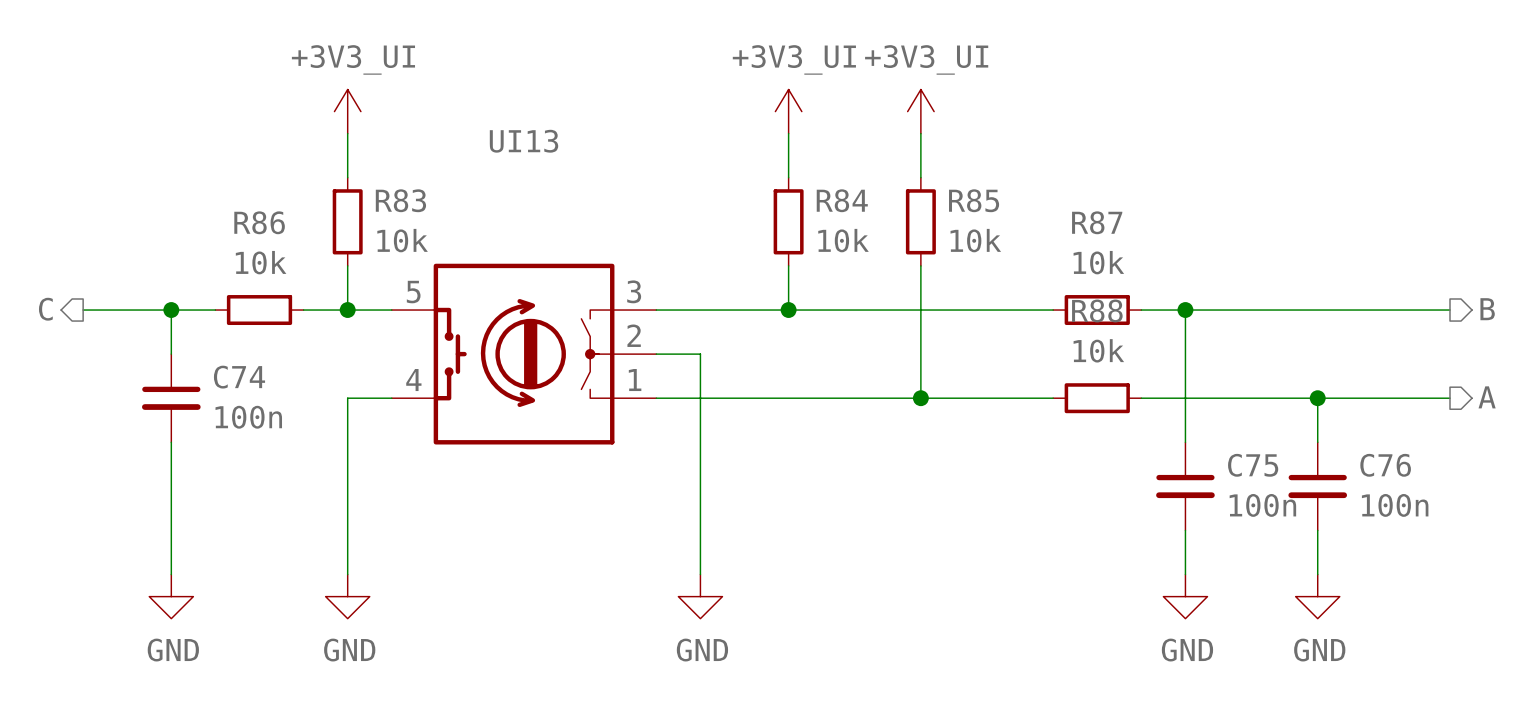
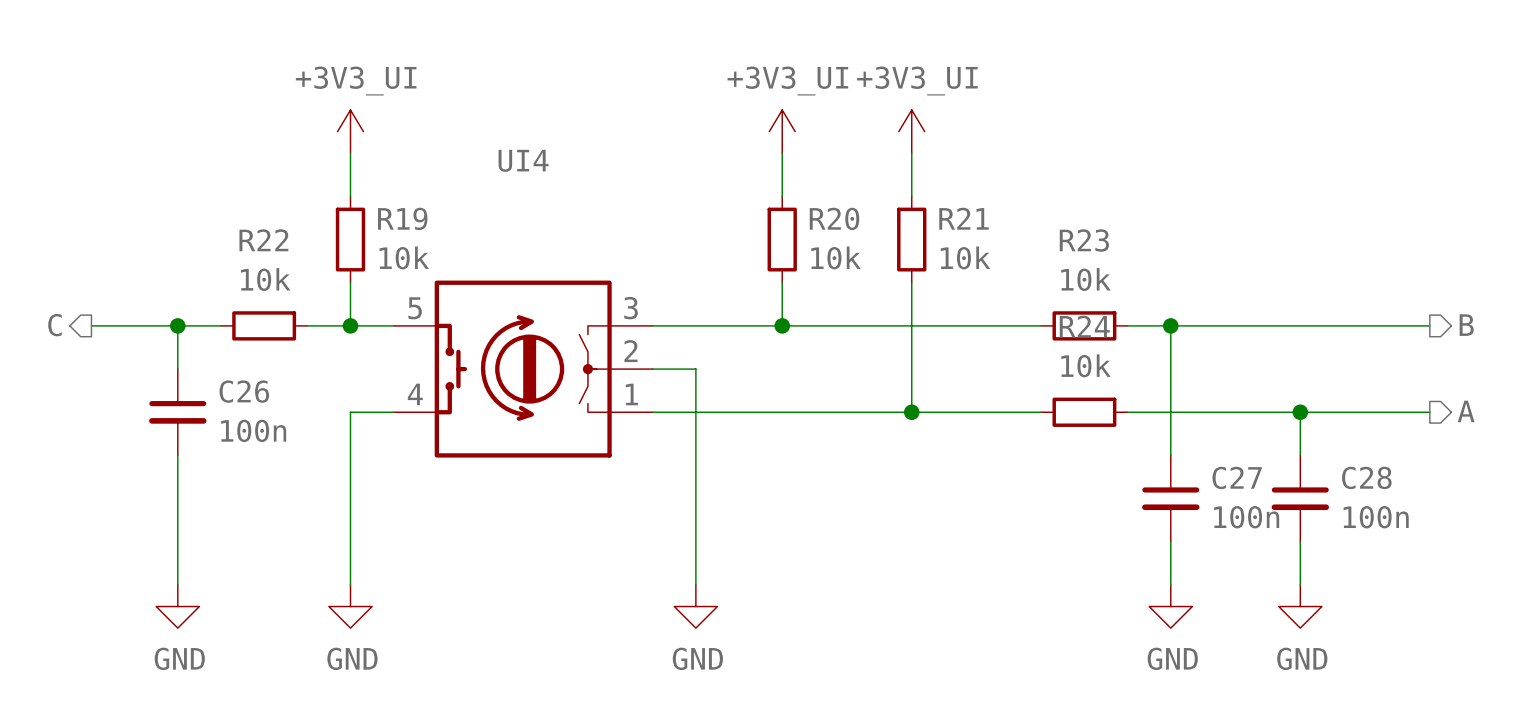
UI13 name: UI13 (524, 141) -> UI4 (523, 160)
R83 name: R83 (400, 200) -> R19 (402, 218)
R84 name: R84 (842, 200) -> R20 (834, 218)
R85 name: R85 (974, 200) -> R21 (963, 218)
R86 name: R86 (259, 222) -> R22 (263, 240)
R87 name: R87 (1097, 222) -> R23 (1084, 240)
R88 name: R88 (1097, 310) -> R24 (1084, 326)
C74 name: C74 (239, 377) -> C26 (244, 391)
C75 name: C75 (1253, 465) -> C27 (1237, 477)
C76 name: C76 (1385, 465) -> C28 (1366, 477)

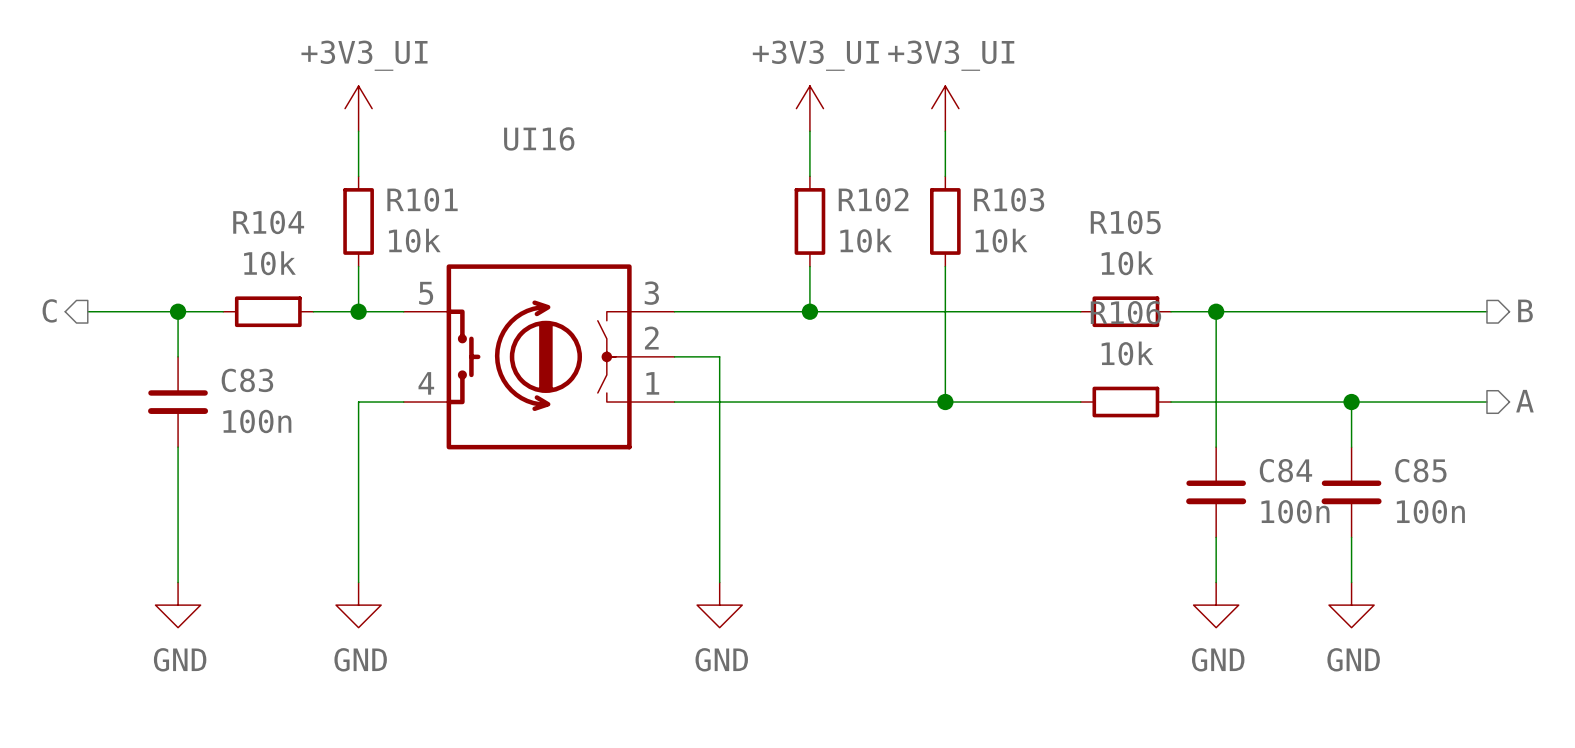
UI4 name: UI4 (523, 160) -> UI16 (539, 138)
R19 name: R19 (402, 218) -> R101 (422, 199)
R20 name: R20 (834, 218) -> R102 (873, 199)
R21 name: R21 (963, 218) -> R103 (1009, 199)
R22 name: R22 (263, 240) -> R104 (268, 222)
R23 name: R23 (1084, 240) -> R105 (1125, 222)
R24 name: R24 (1084, 326) -> R106 (1125, 312)
C26 name: C26 (244, 391) -> C83 (247, 380)
C27 name: C27 (1237, 477) -> C84 (1285, 470)
C28 name: C28 (1366, 477) -> C85 (1420, 470)

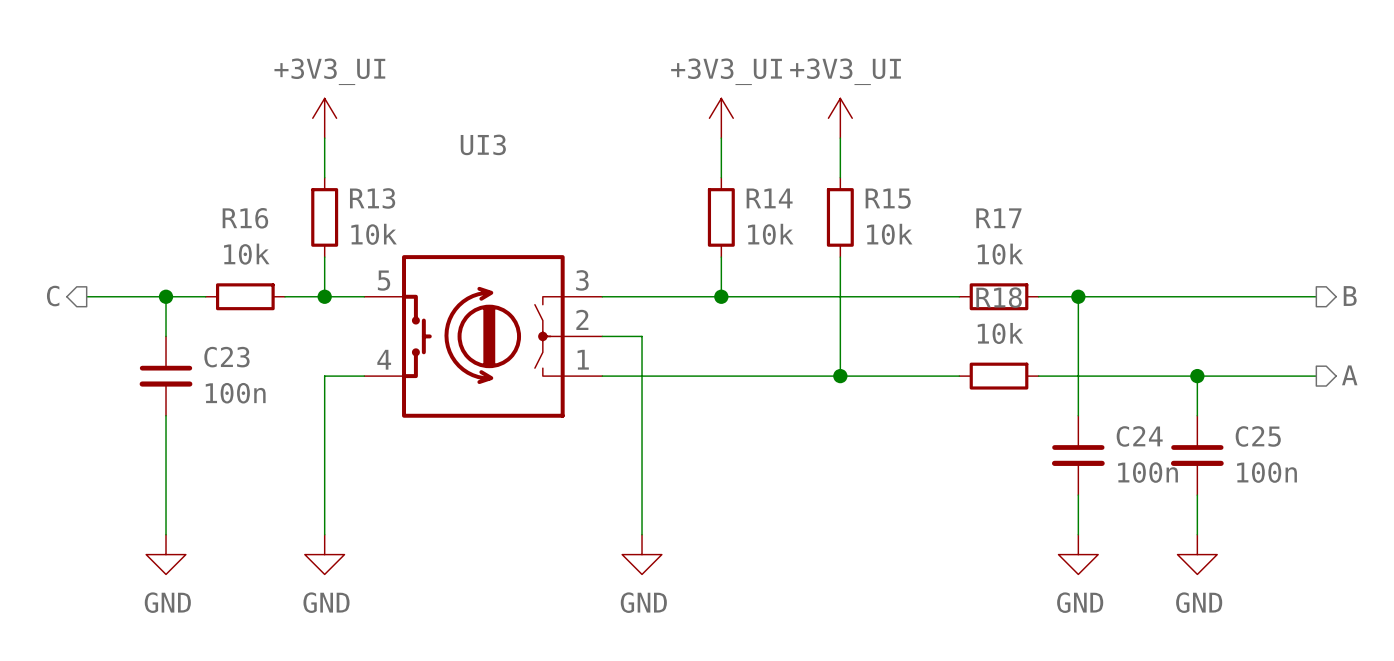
UI16 name: UI16 (539, 138) -> UI3 (483, 144)
R101 name: R101 (422, 199) -> R13 (372, 198)
R102 name: R102 (873, 199) -> R14 (769, 198)
R103 name: R103 (1009, 199) -> R15 (888, 198)
R104 name: R104 (268, 222) -> R16 (245, 218)
R105 name: R105 (1125, 222) -> R17 (998, 218)
R106 name: R106 (1125, 312) -> R18 (999, 297)
C83 name: C83 (247, 380) -> C23 (226, 357)
C84 name: C84 (1285, 470) -> C24 (1139, 436)
C85 name: C85 (1420, 470) -> C25 (1258, 436)

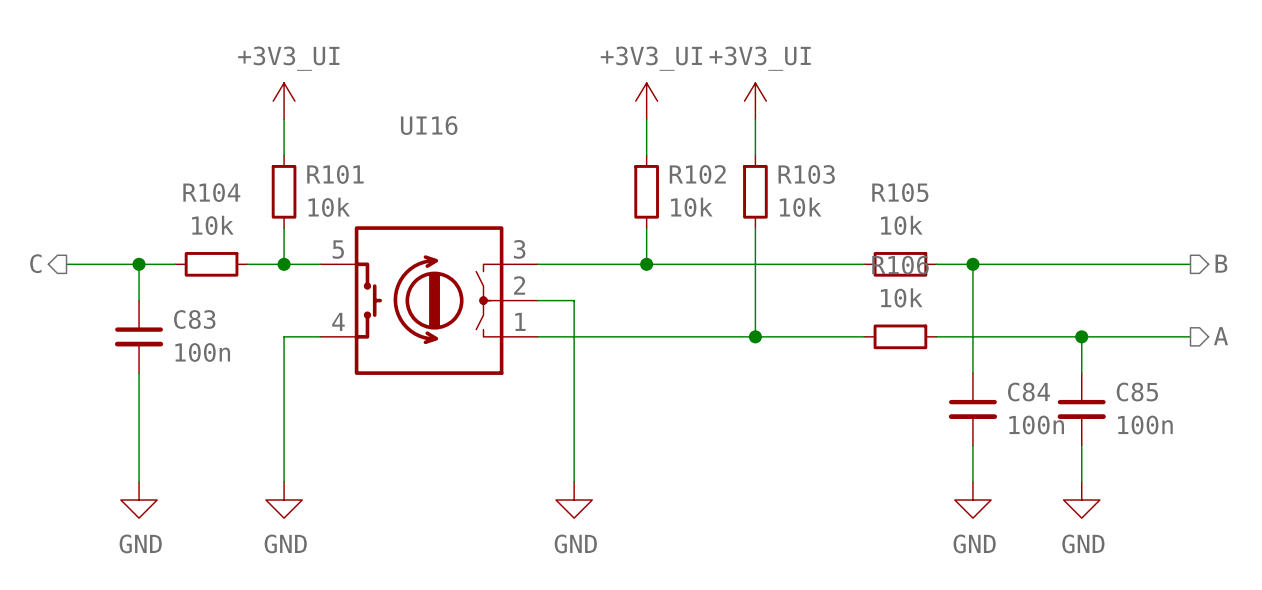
UI3 name: UI3 (483, 144) -> UI16 (429, 125)
R13 name: R13 (372, 198) -> R101 (335, 174)
R14 name: R14 (769, 198) -> R102 (697, 174)
R15 name: R15 (888, 198) -> R103 (806, 174)
R16 name: R16 (245, 218) -> R104 (211, 192)
R17 name: R17 (998, 218) -> R105 (900, 192)
R18 name: R18 (999, 297) -> R106 (900, 265)
C23 name: C23 (226, 357) -> C83 (194, 319)
C24 name: C24 (1139, 436) -> C84 (1029, 392)
C25 name: C25 (1258, 436) -> C85 (1137, 392)

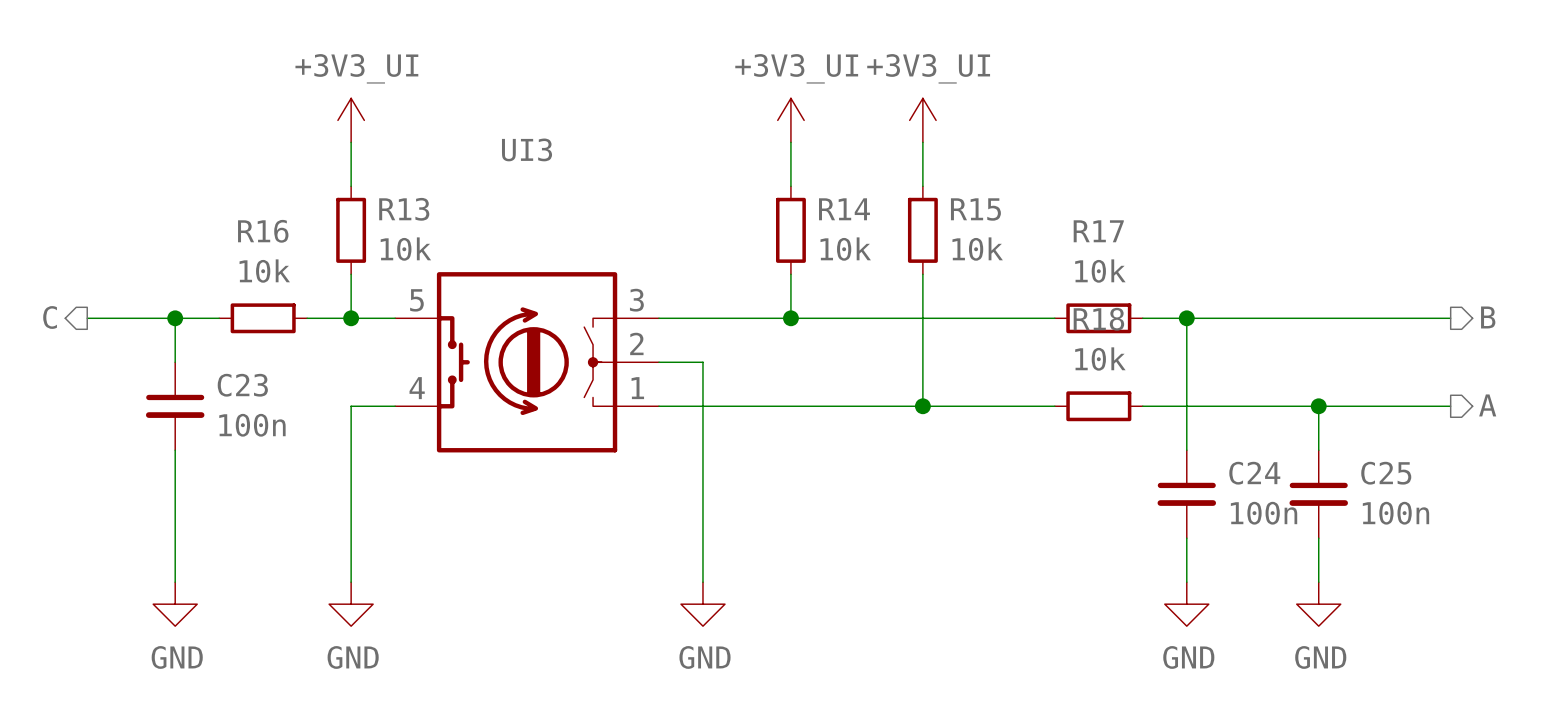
UI16 name: UI16 (429, 125) -> UI3 (527, 149)
R101 name: R101 (335, 174) -> R13 (404, 209)
R102 name: R102 (697, 174) -> R14 (844, 209)
R103 name: R103 (806, 174) -> R15 (975, 209)
R104 name: R104 (211, 192) -> R16 (263, 231)
R105 name: R105 (900, 192) -> R17 (1098, 231)
R106 name: R106 (900, 265) -> R18 (1098, 319)
C83 name: C83 (194, 319) -> C23 (242, 385)
C84 name: C84 (1029, 392) -> C24 (1254, 473)
C85 name: C85 (1137, 392) -> C25 (1386, 473)

